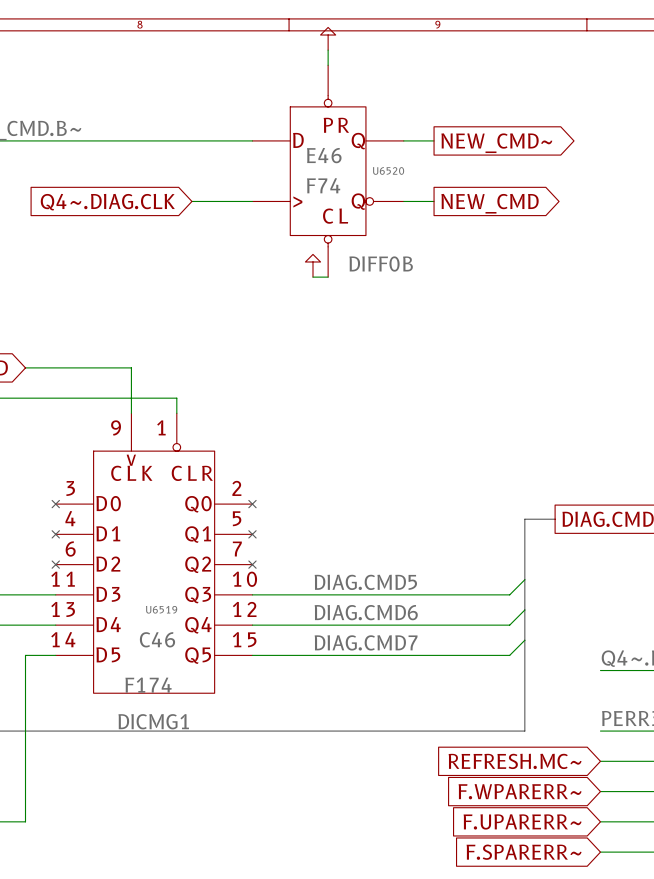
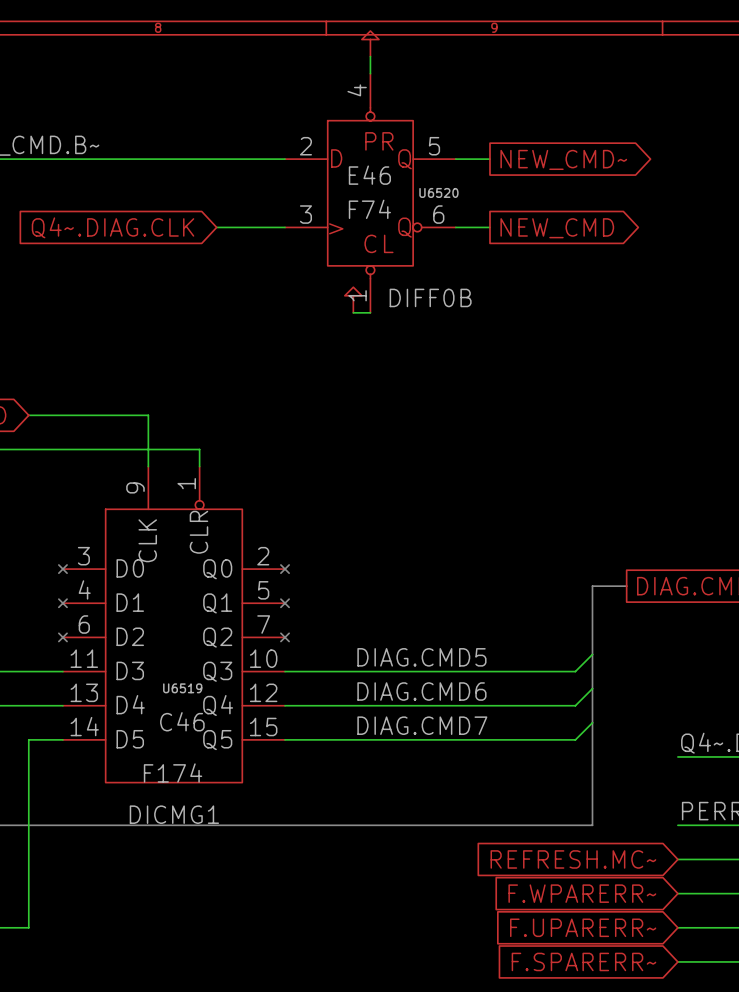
U6520 pin number: none -> 4 (357, 90)
U6520 pin number: none -> 2 (305, 146)
U6520 pin number: none -> 5 (434, 146)
U6520 pin number: none -> 3 (305, 214)
U6520 pin number: none -> 6 (438, 214)
U6520 pin number: none -> 1 (357, 295)
U6519 symbol: [55, 413, 253, 694] -> [62, 466, 286, 783]

